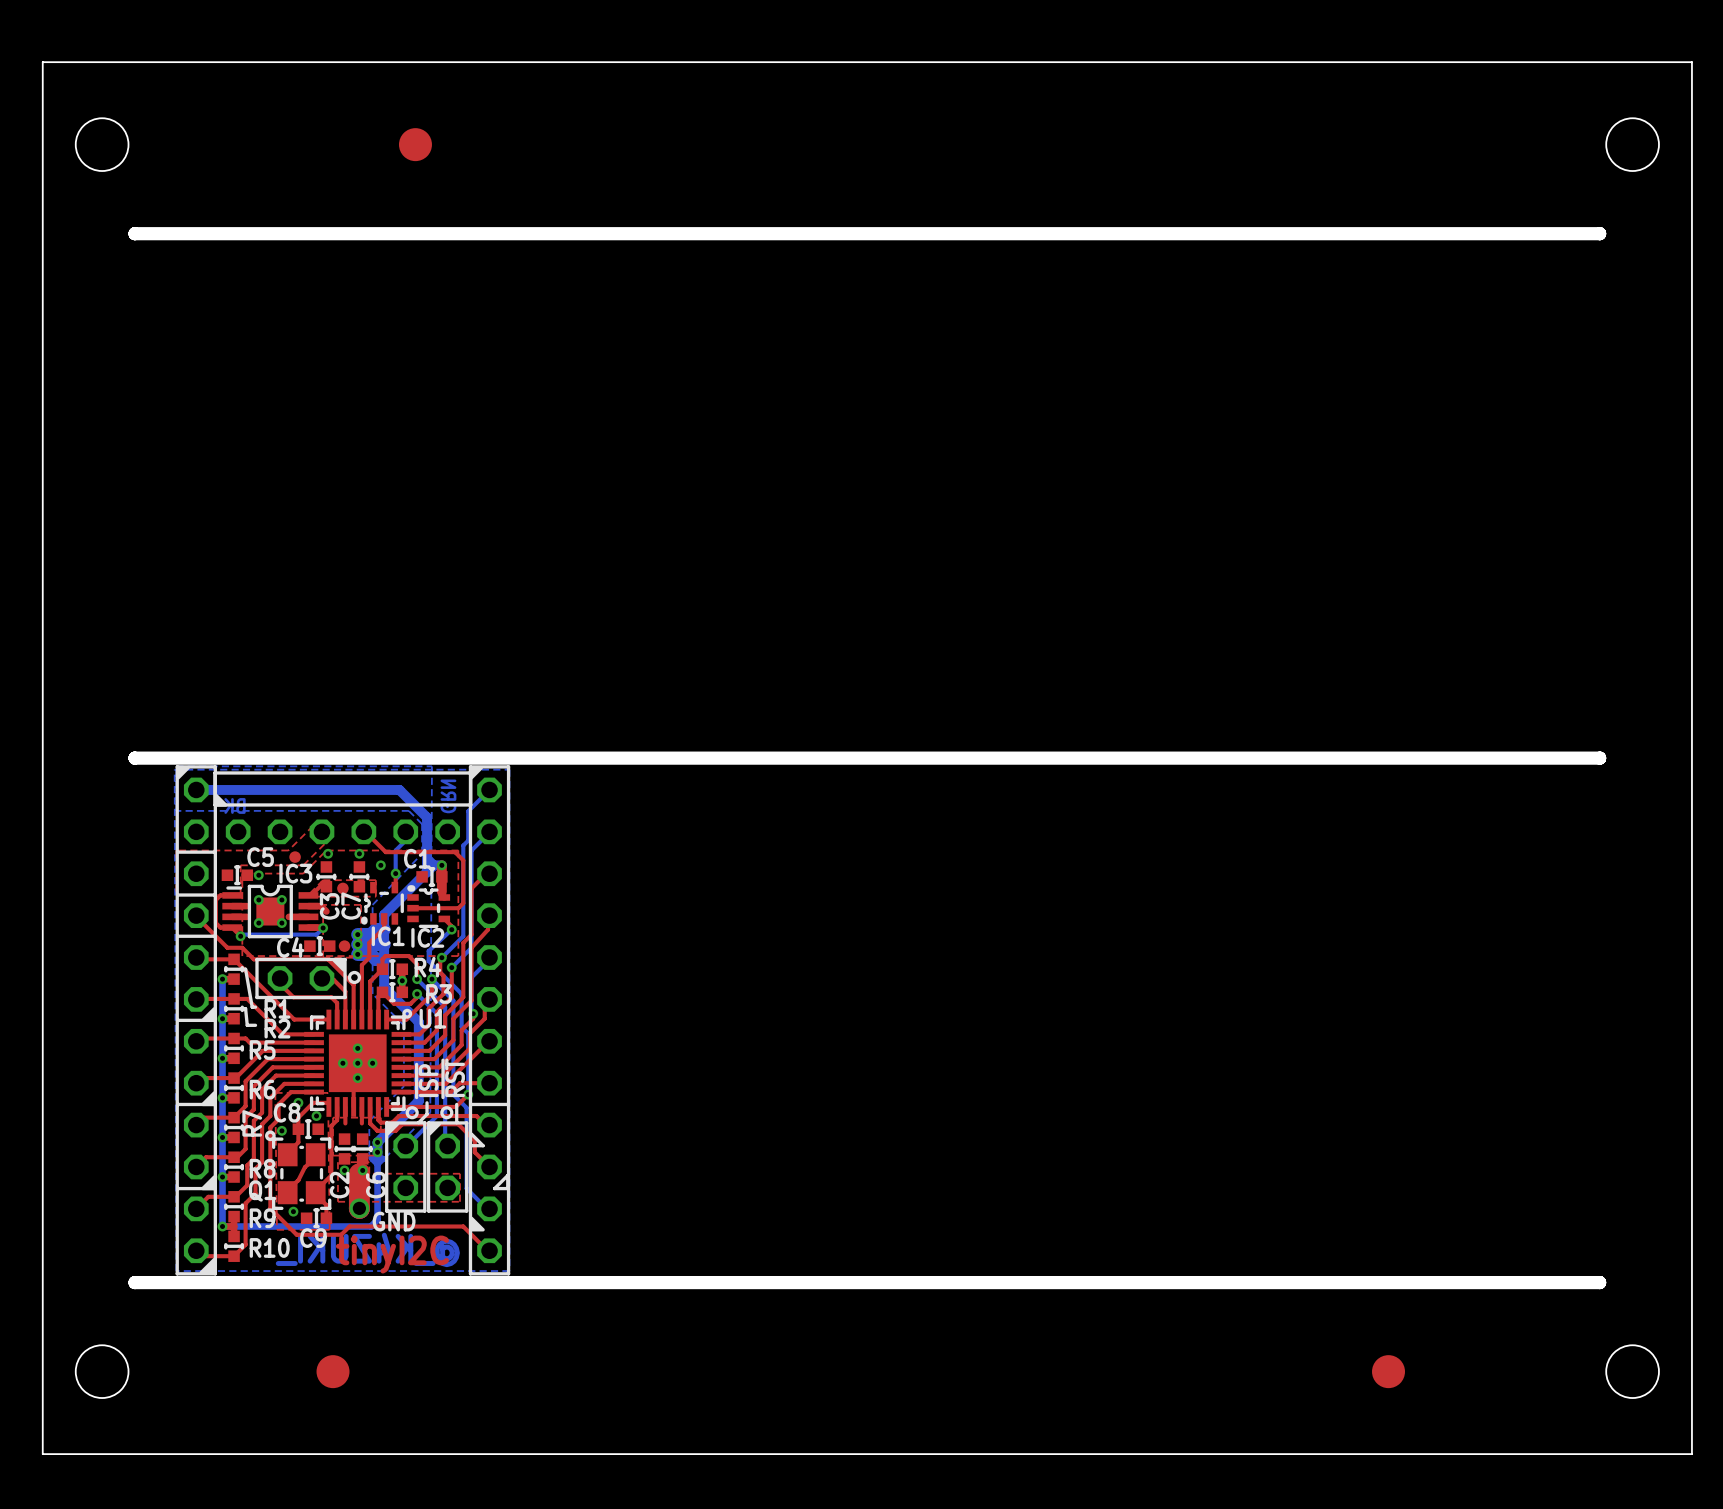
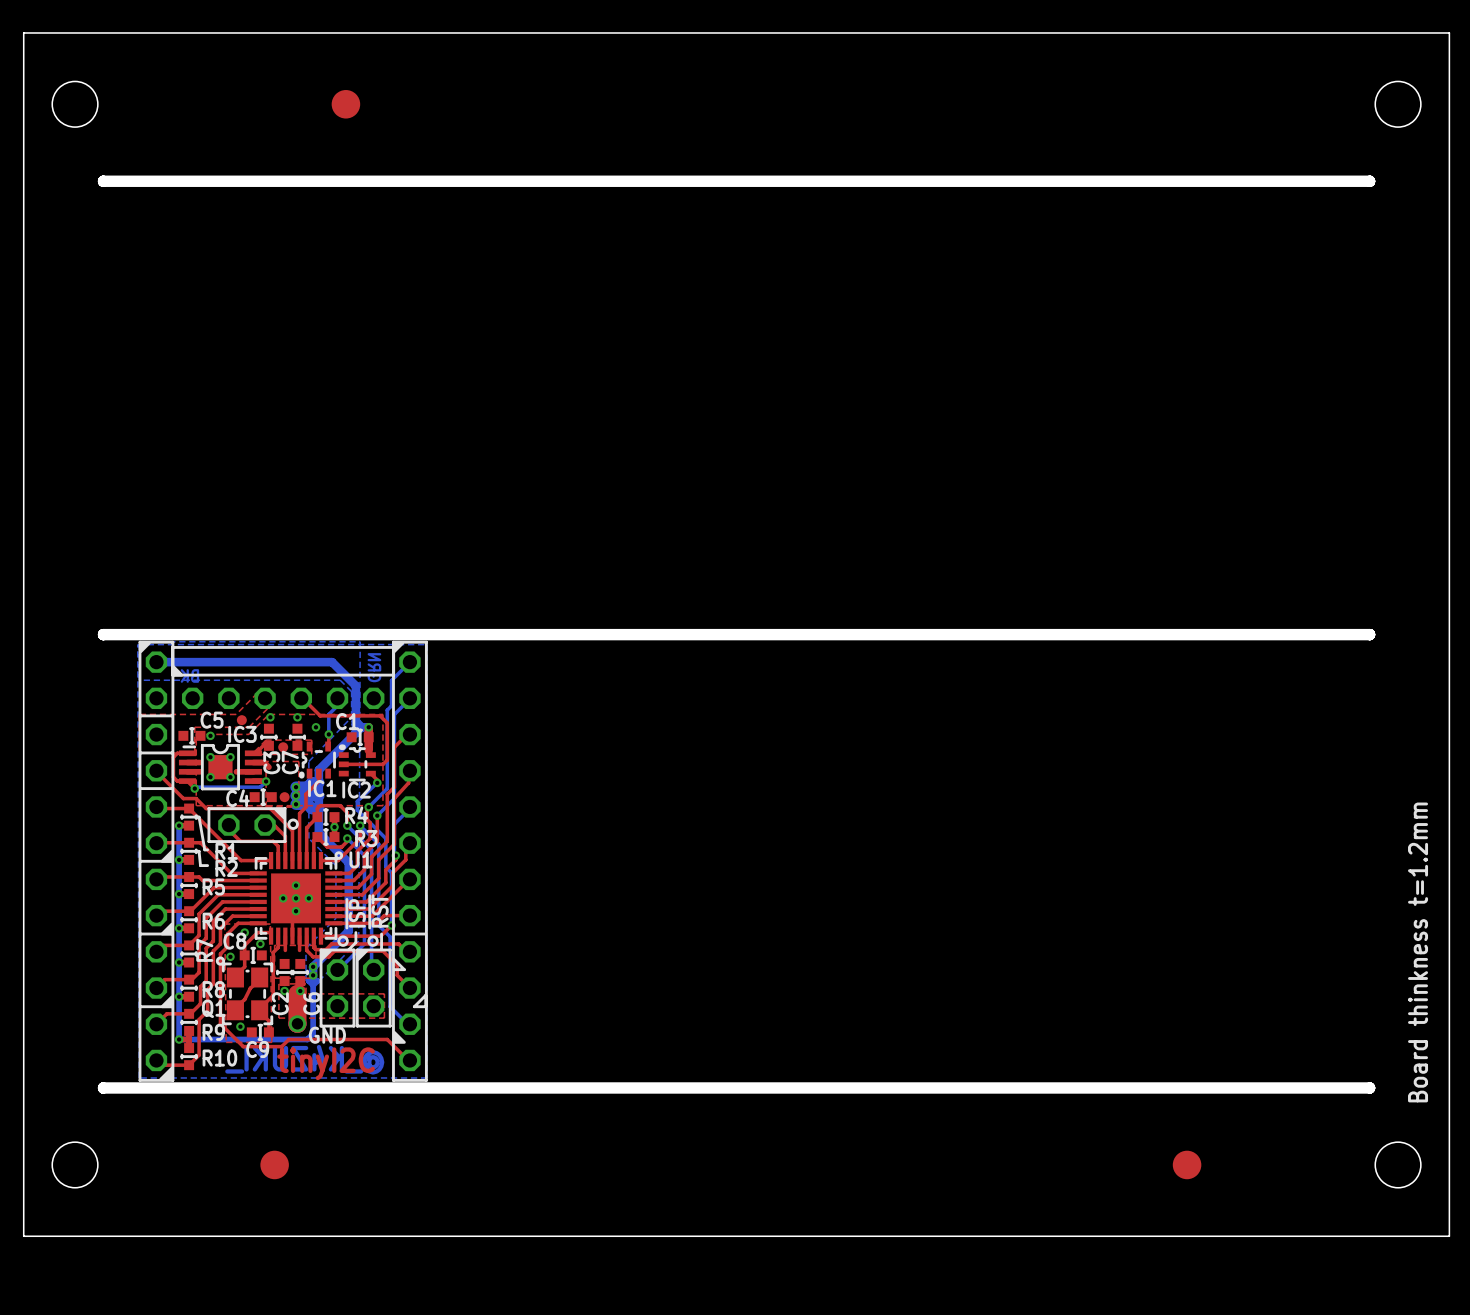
text: none -> Board thinkness t=1.2mm (1418, 952)

